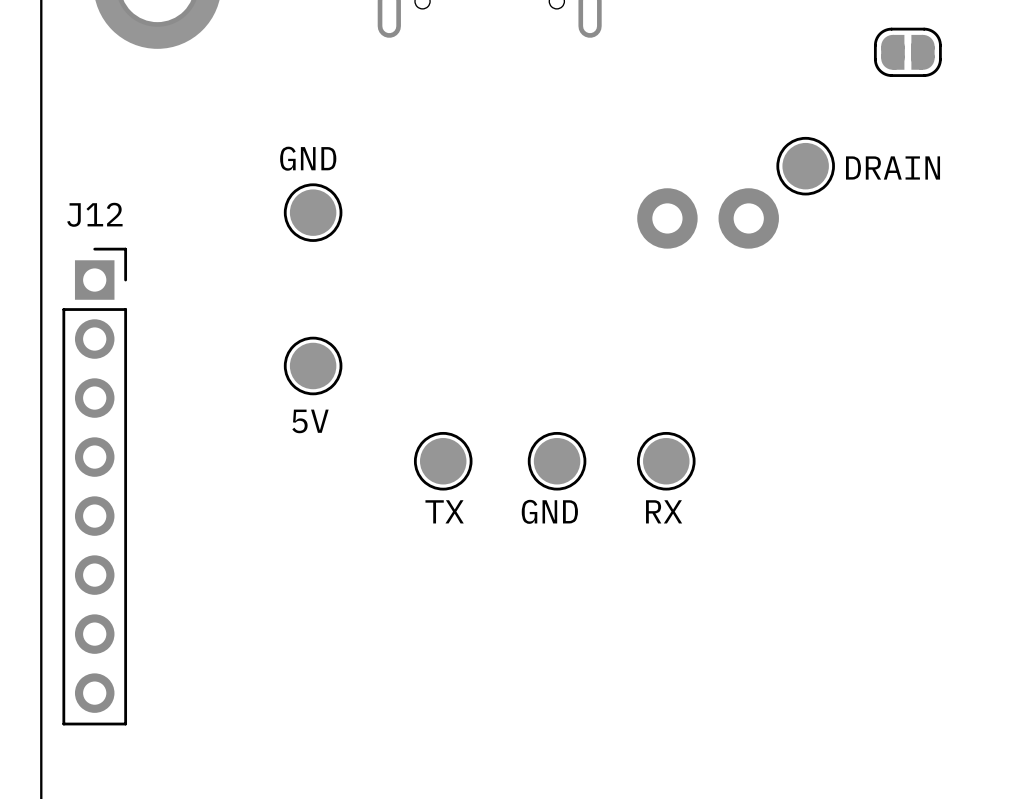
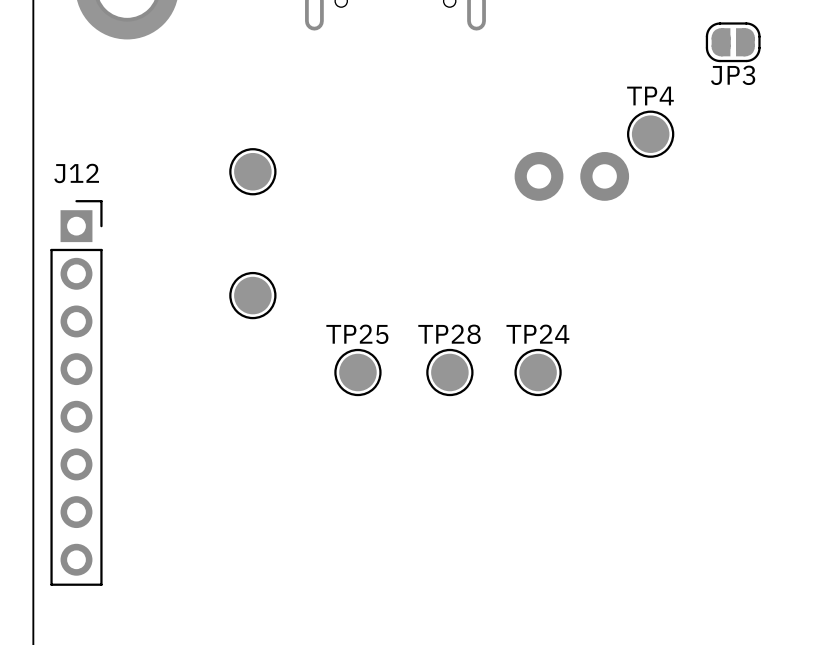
JP3 name: none -> JP3 (733, 75)
TP4 name: none -> TP4 (650, 96)
text: GND (308, 158) -> none
text: DRAIN (893, 167) -> none
TP25 name: none -> TP25 (357, 334)
TP28 name: none -> TP28 (449, 334)
TP24 name: none -> TP24 (537, 334)
text: 5V (310, 421) -> none
text: TX (444, 511) -> none
text: GND (549, 511) -> none
text: RX (664, 511) -> none

